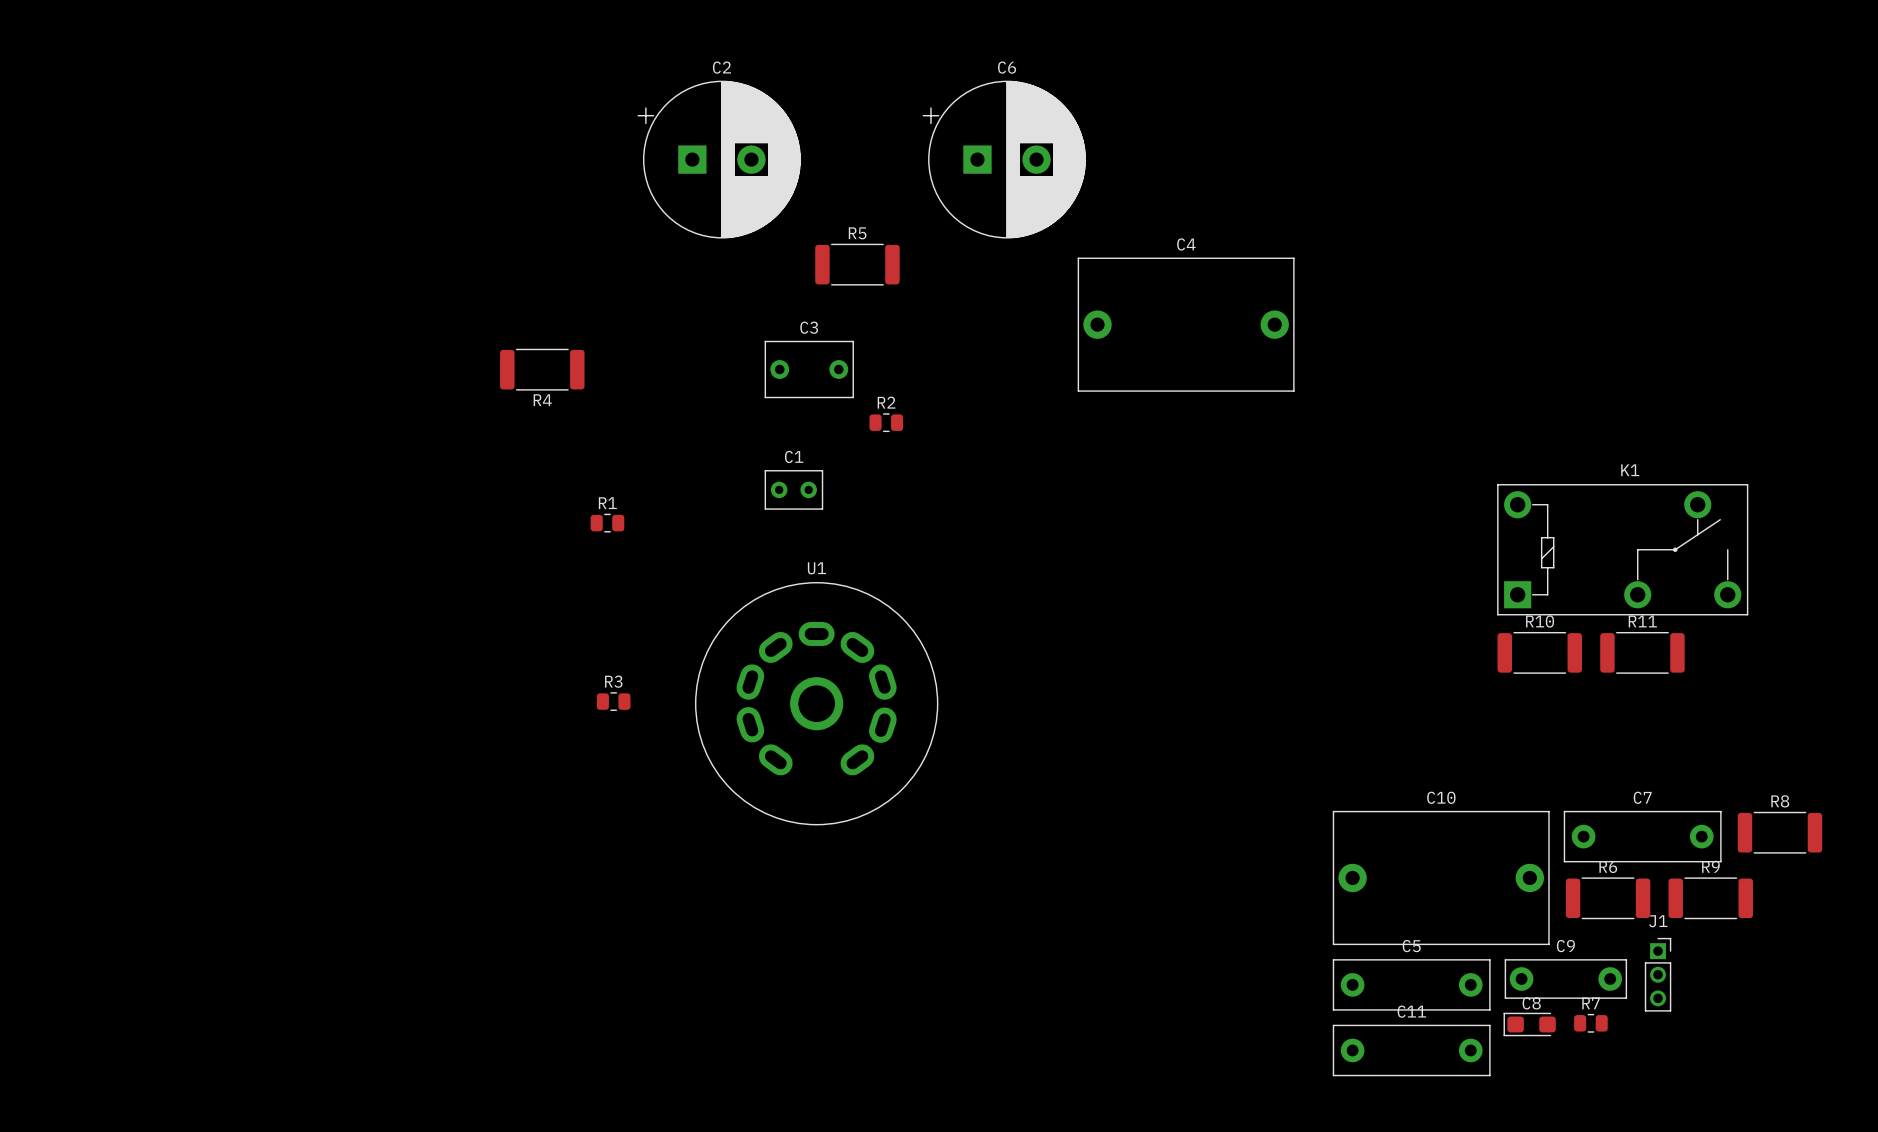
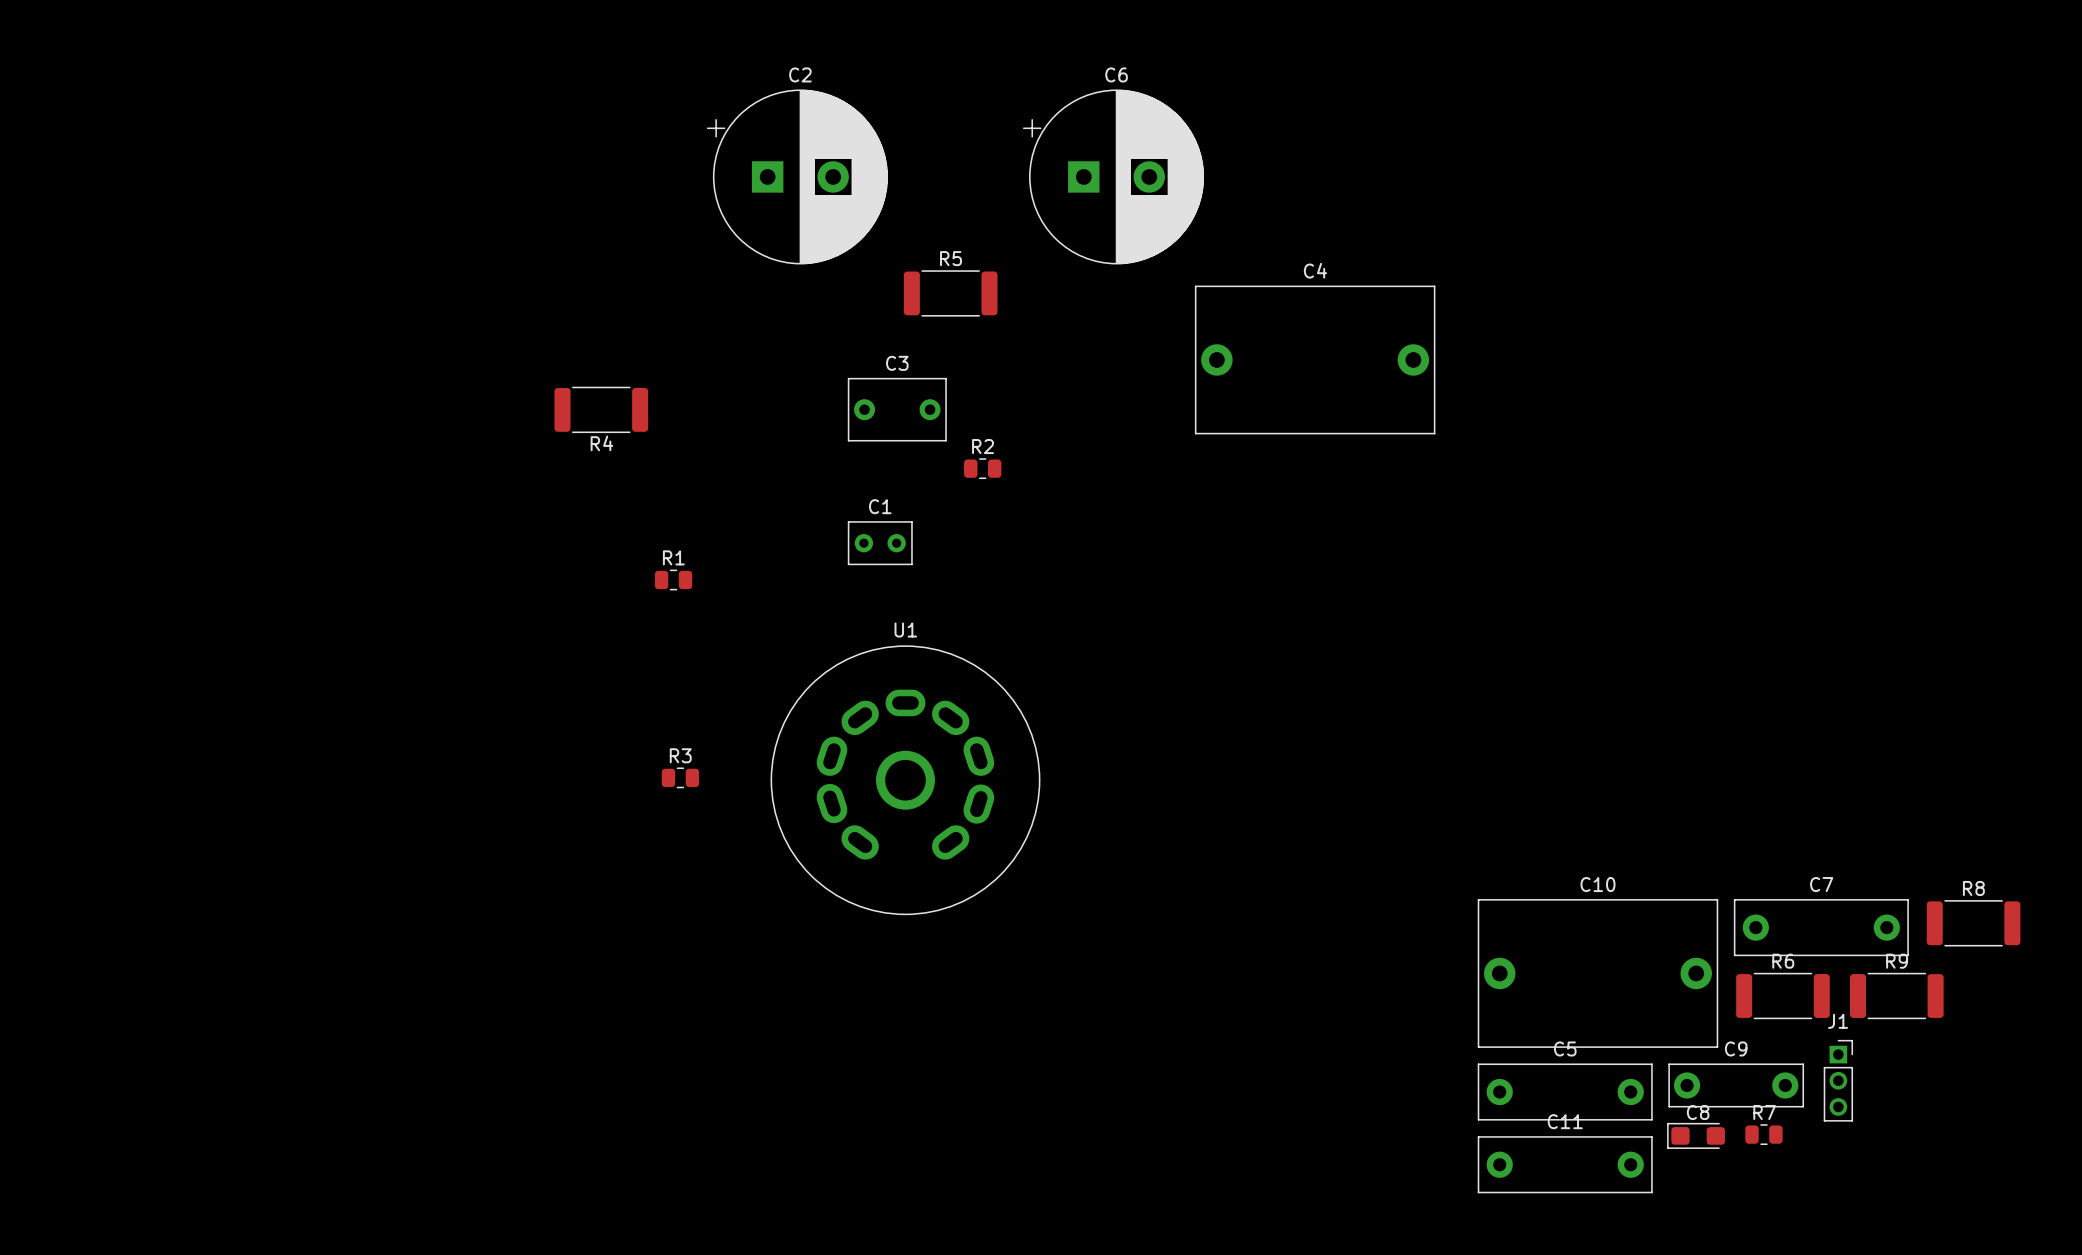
K1: (1622, 549) -> none
R10: (1539, 652) -> none
R11: (1642, 652) -> none

